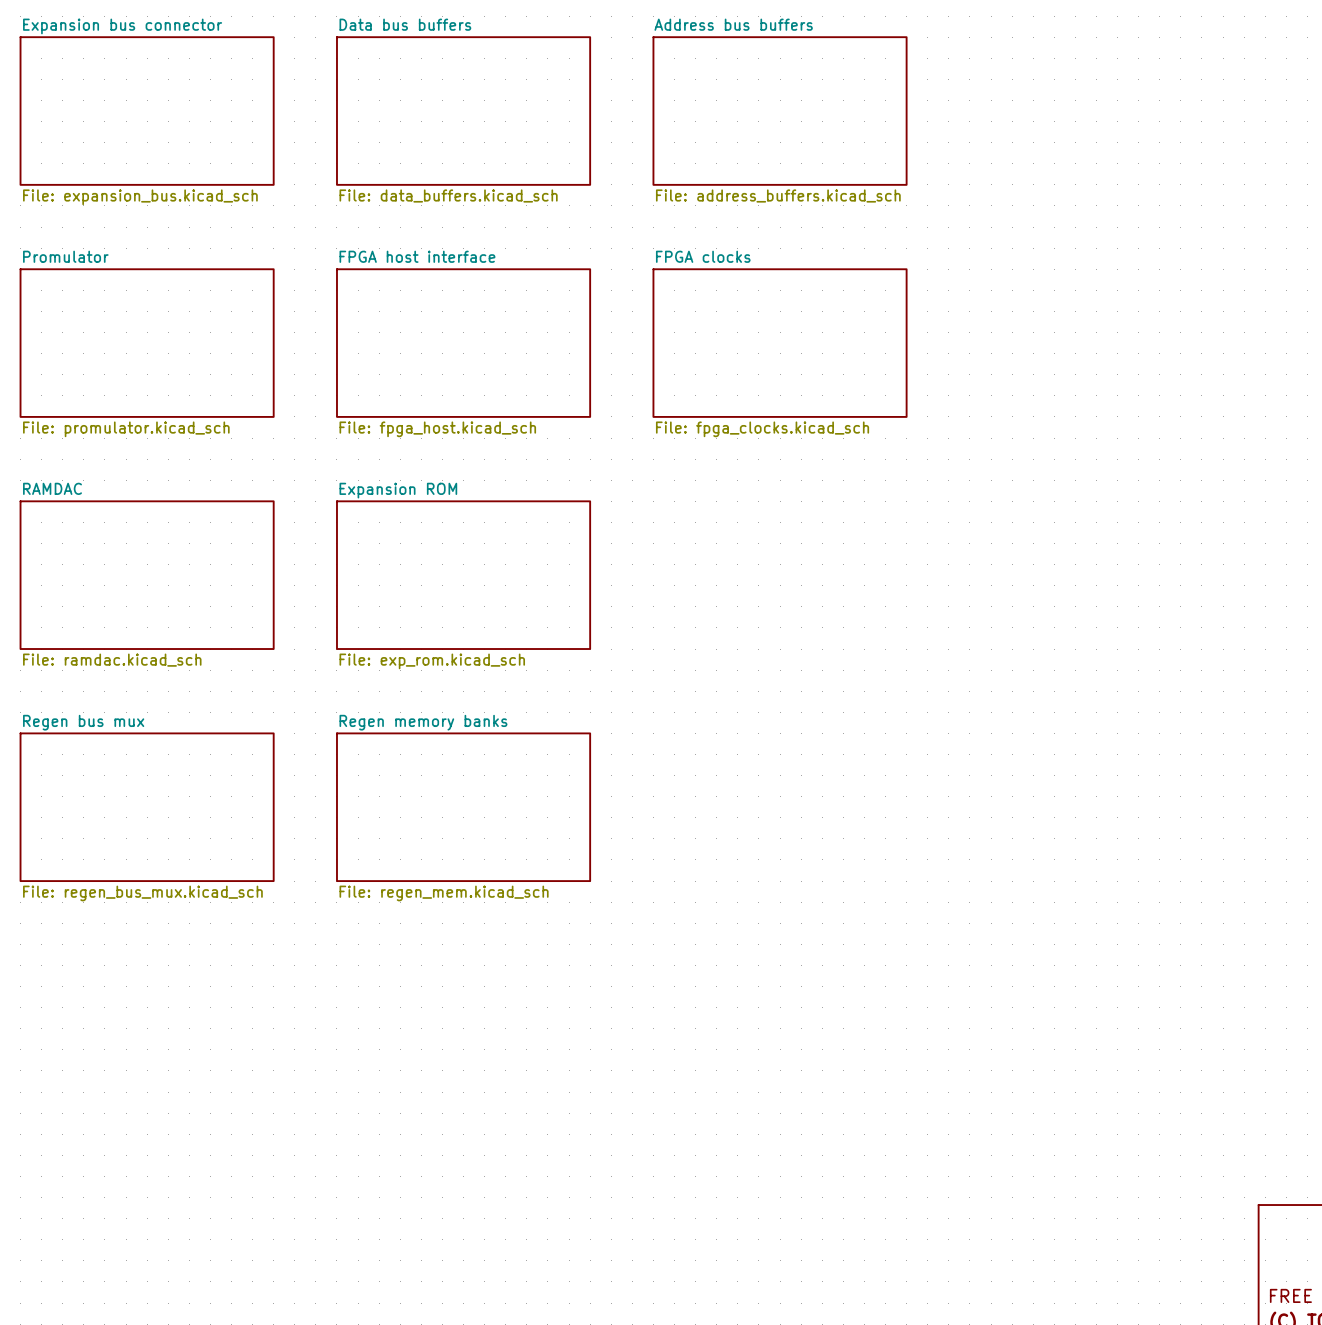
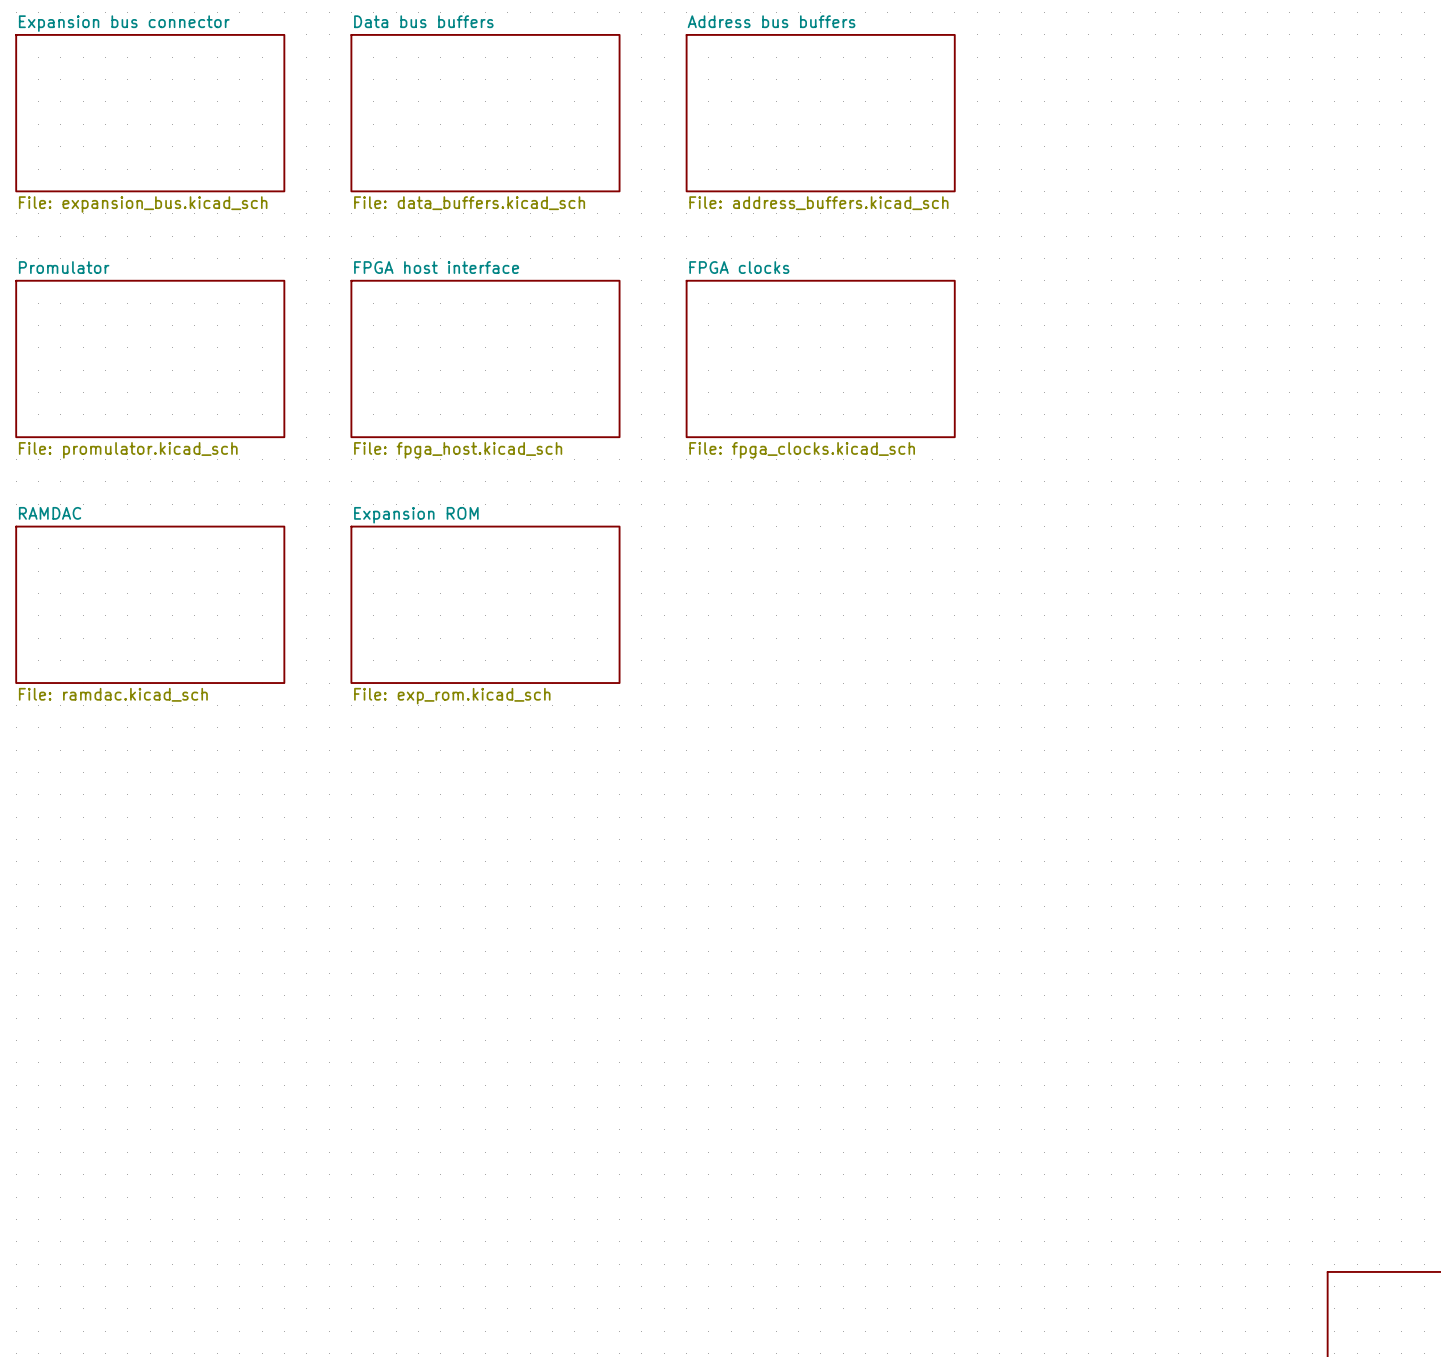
sheet Regen bus mux: File: regen_bus_mux.kicad_sch (147, 807) -> none
sheet Regen memory banks: File: regen_mem.kicad_sch (463, 807) -> none

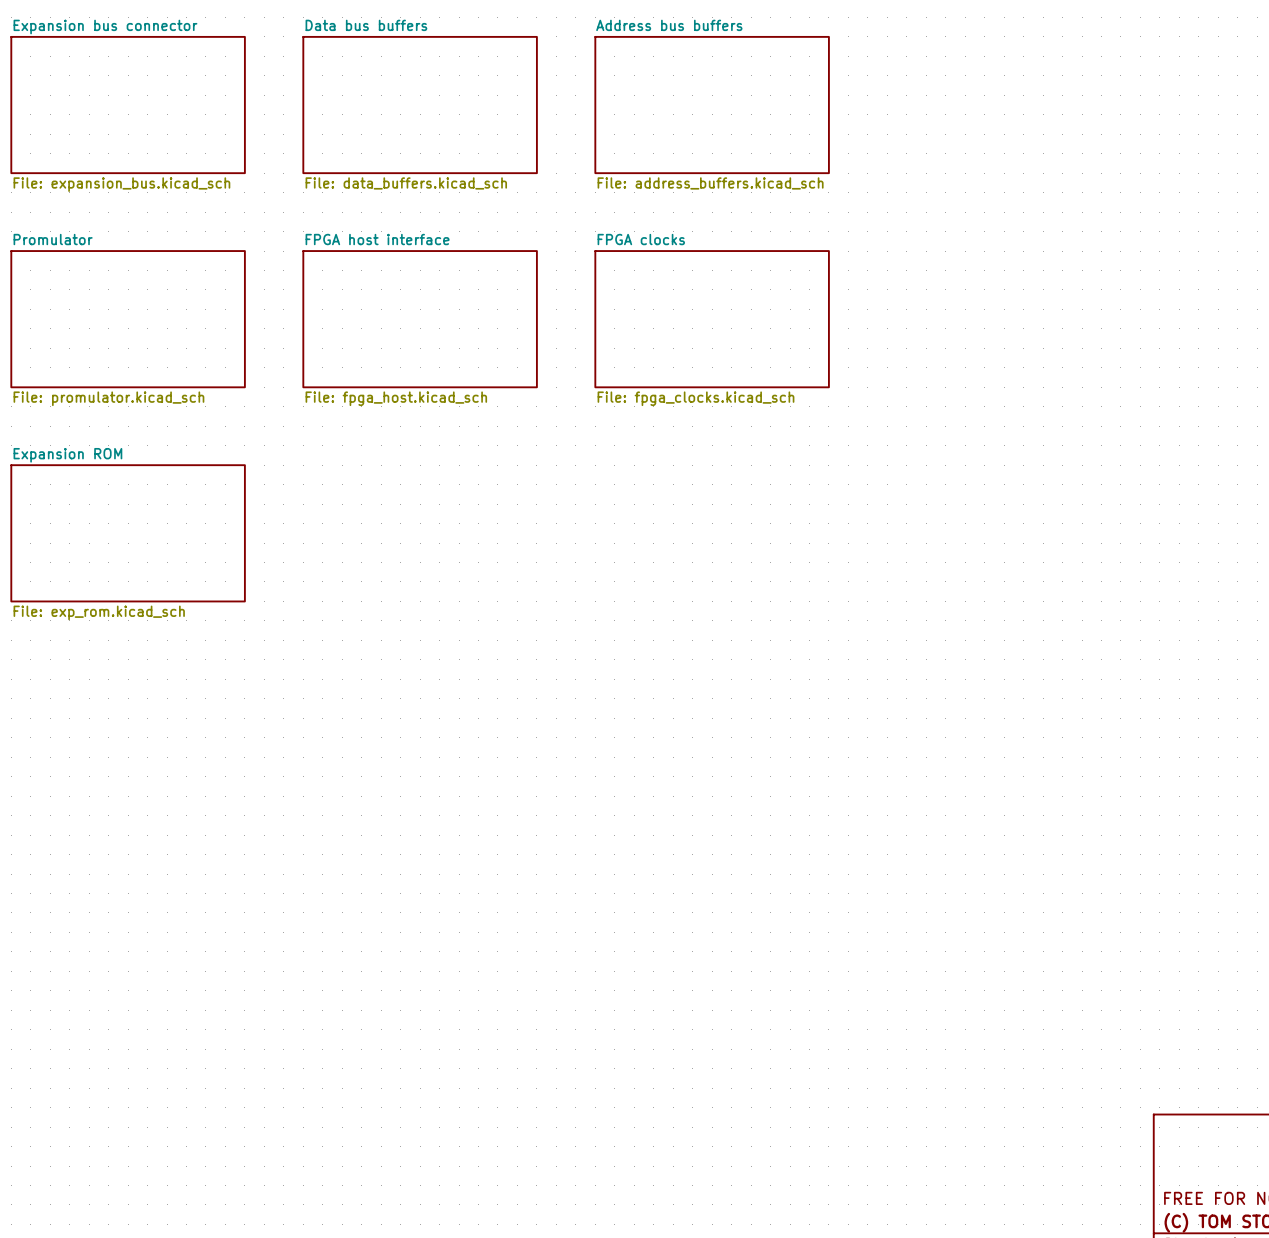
sheet RAMDAC name: RAMDAC (50, 513) -> Expansion ROM (67, 455)
sheet Expansion ROM: File: exp_rom.kicad_sch (485, 604) -> none
sheet RAMDAC value: File: ramdac.kicad_sch (113, 694) -> File: exp_rom.kicad_sch (99, 612)

